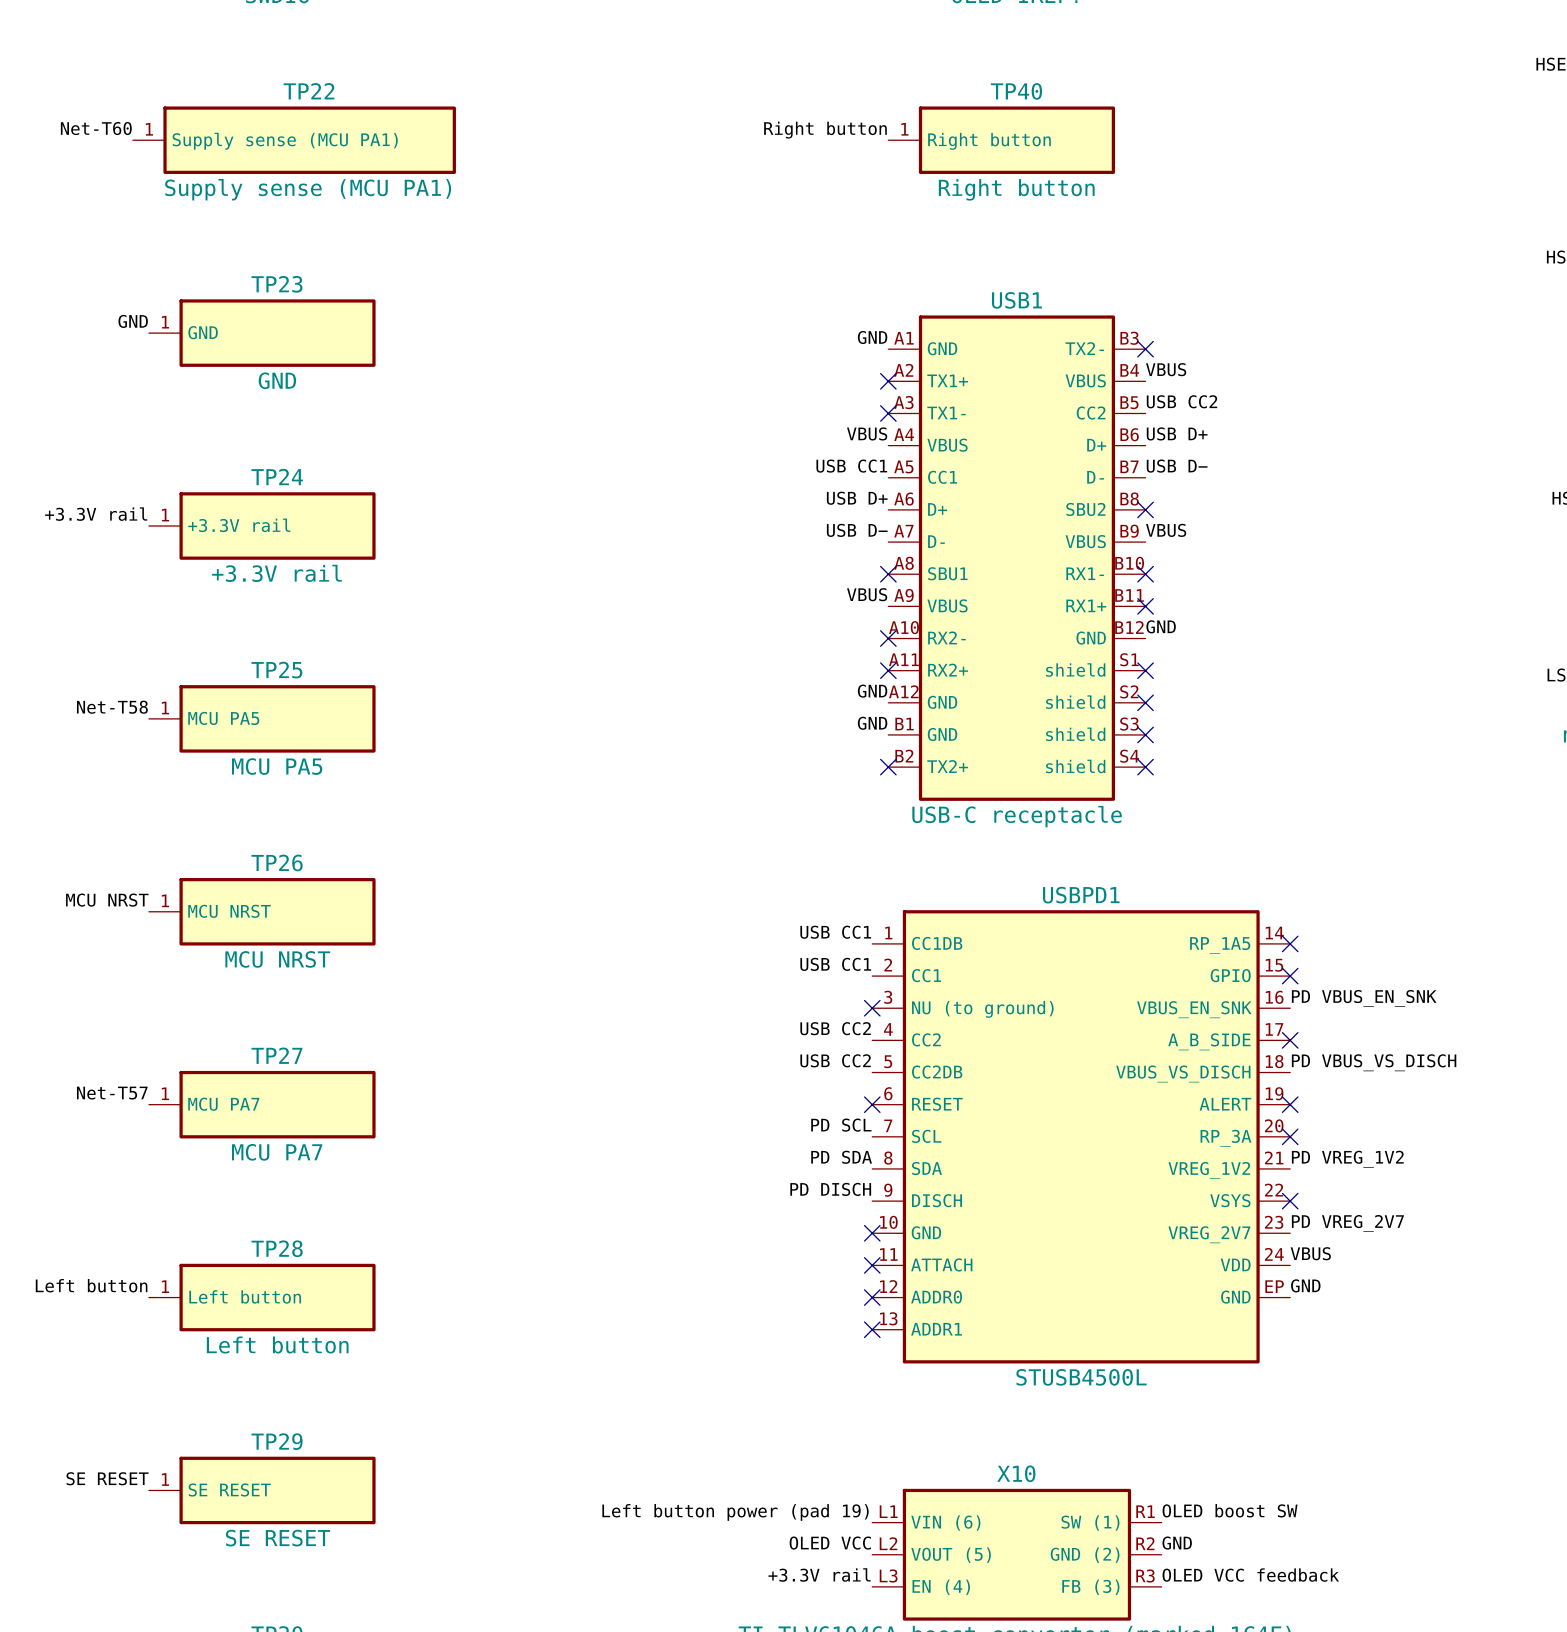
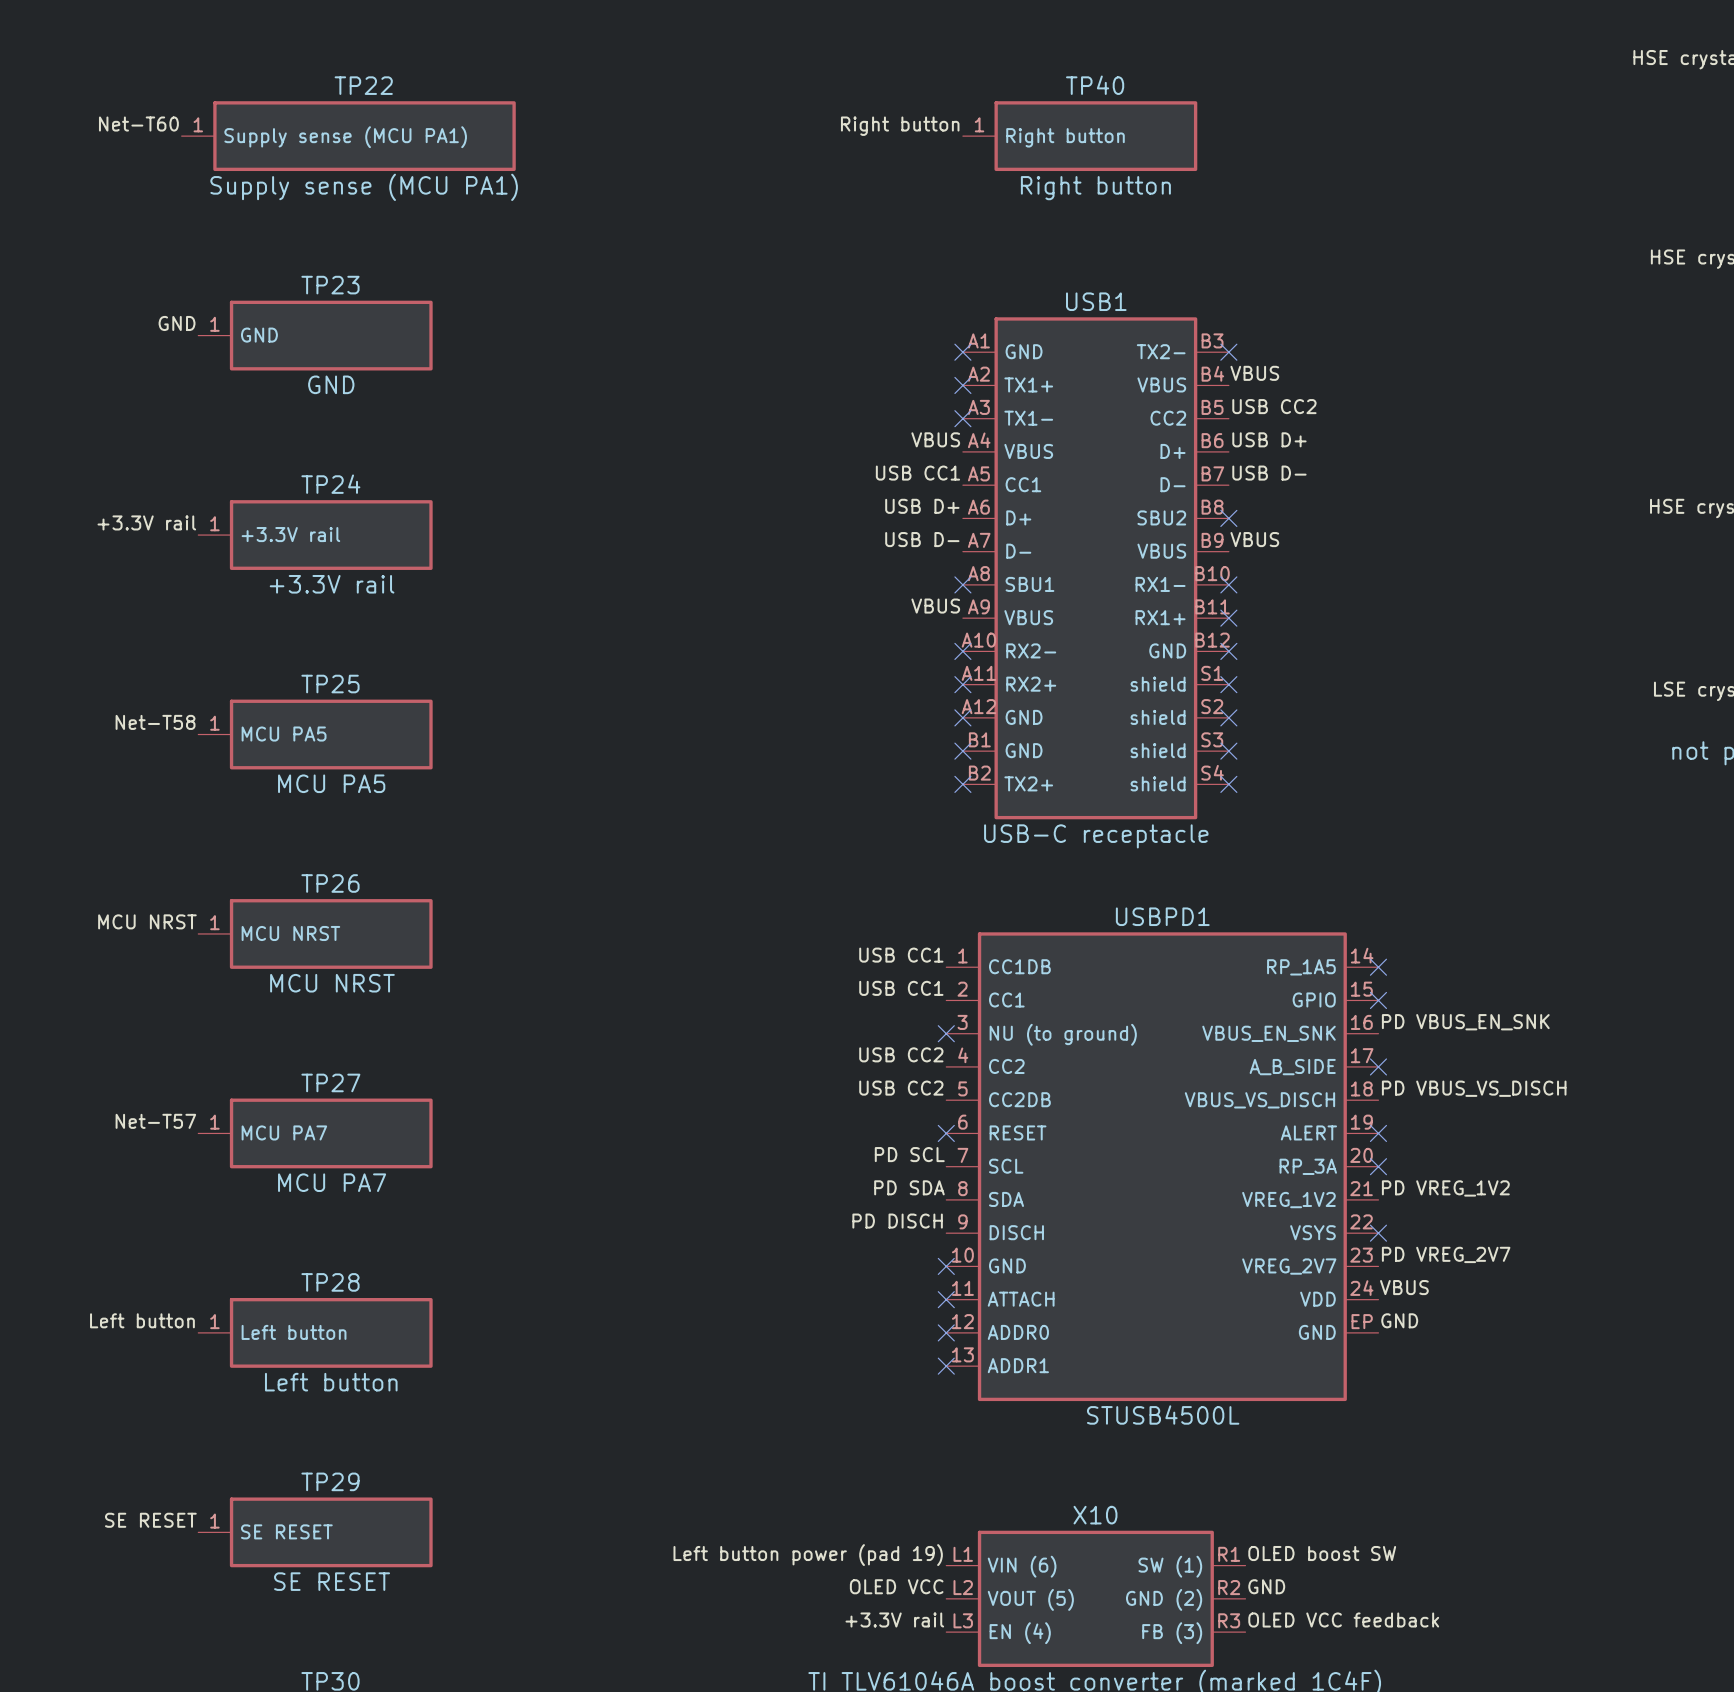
label: GND (872, 337) -> none
no-connect mark: none -> (962, 352)
label: GND (1161, 626) -> none
no-connect mark: none -> (1228, 651)
label: GND (872, 691) -> none
no-connect mark: none -> (962, 717)
label: GND (872, 723) -> none
no-connect mark: none -> (962, 751)

